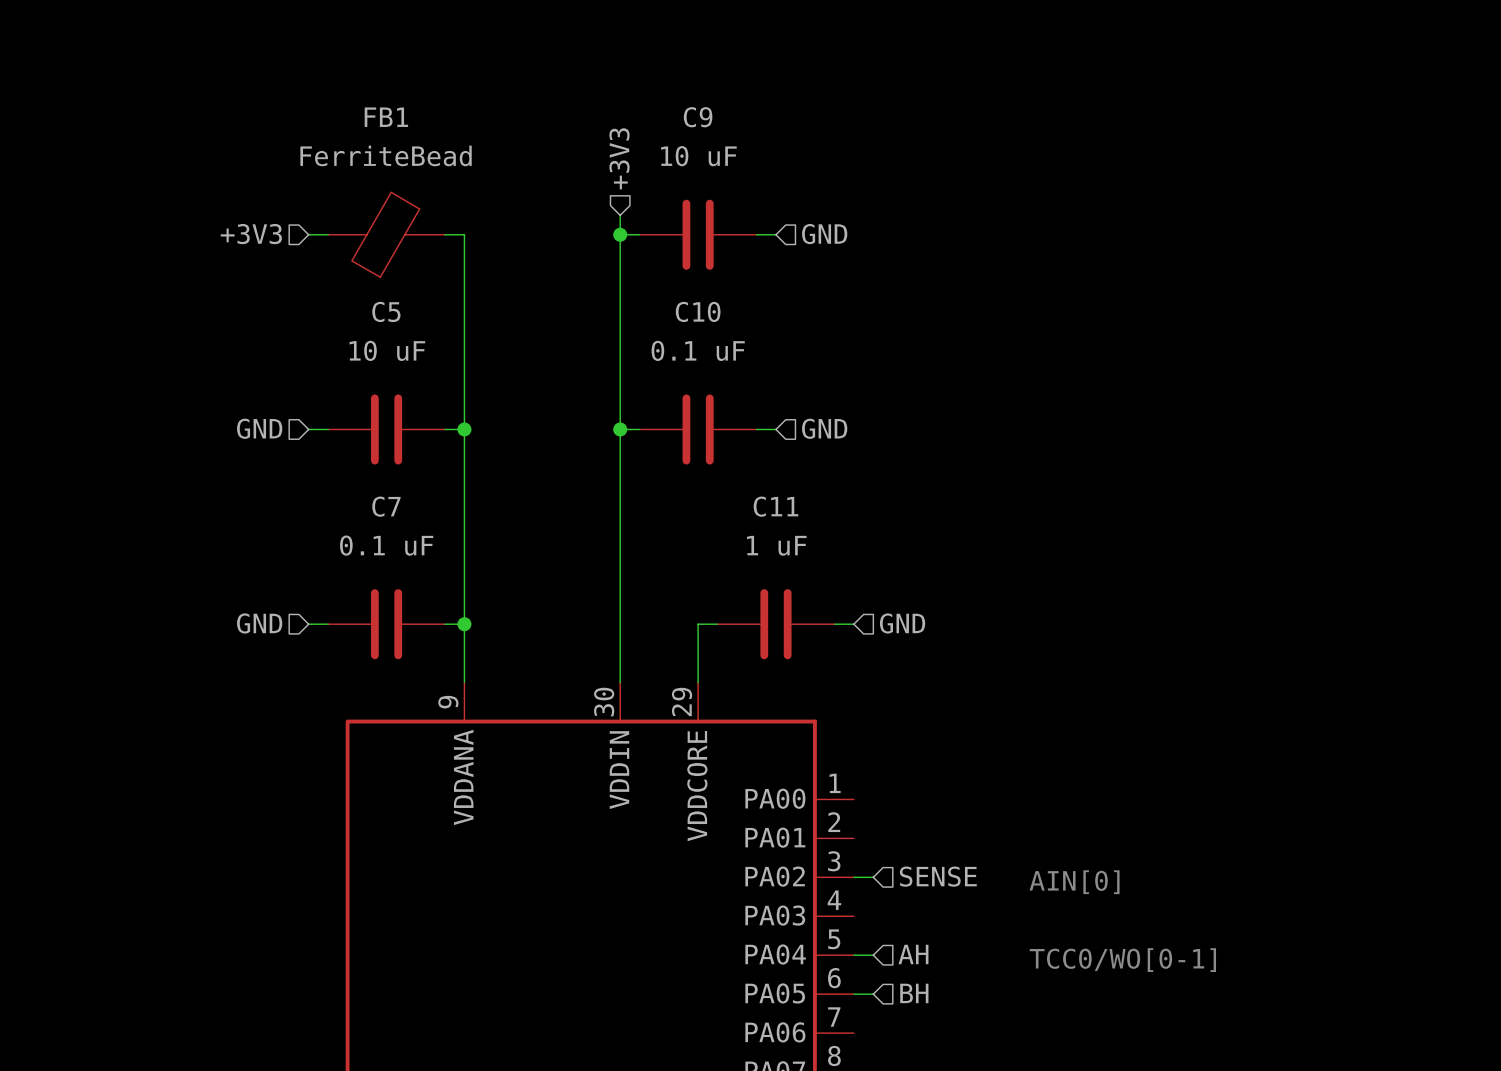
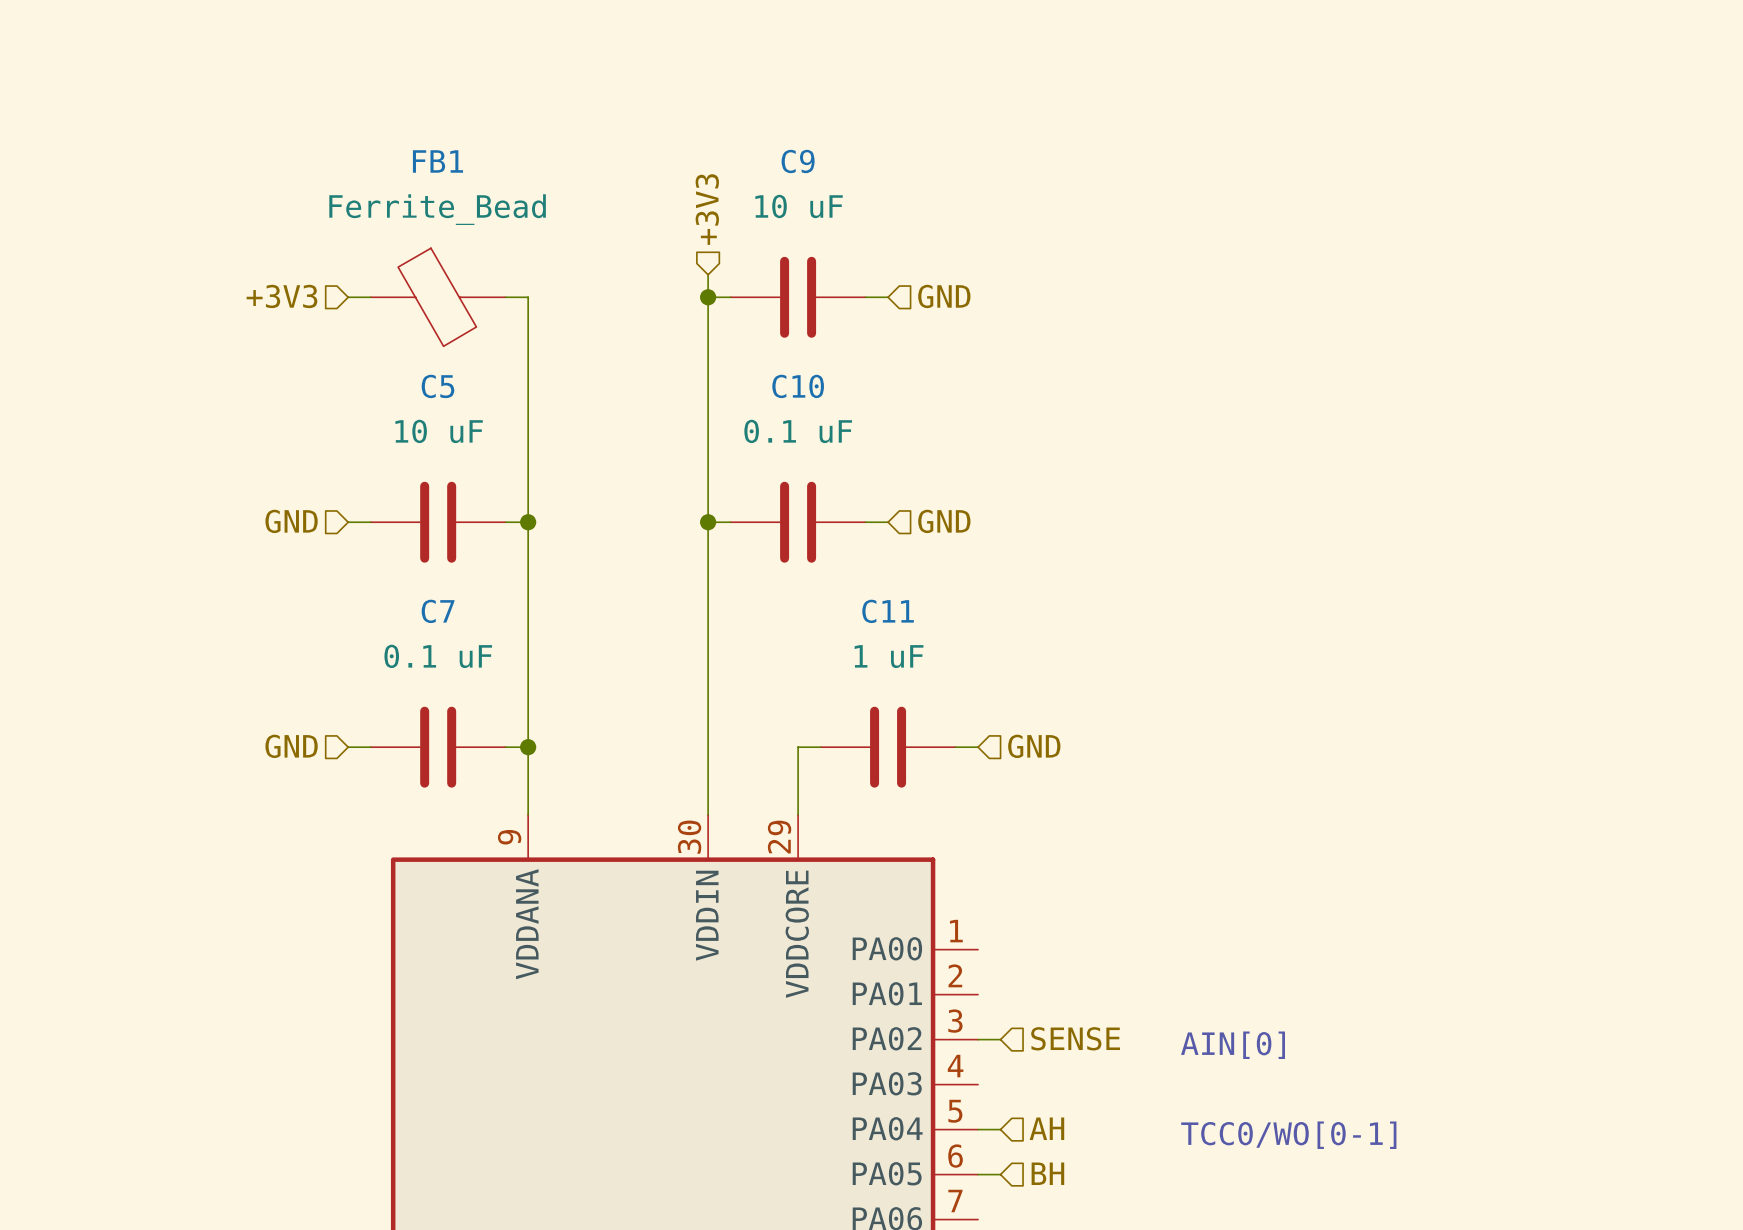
FB1 value: FerriteBead (386, 155) -> Ferrite_Bead (437, 209)
FB1 flip: as is (385, 234) -> up-down (437, 297)

